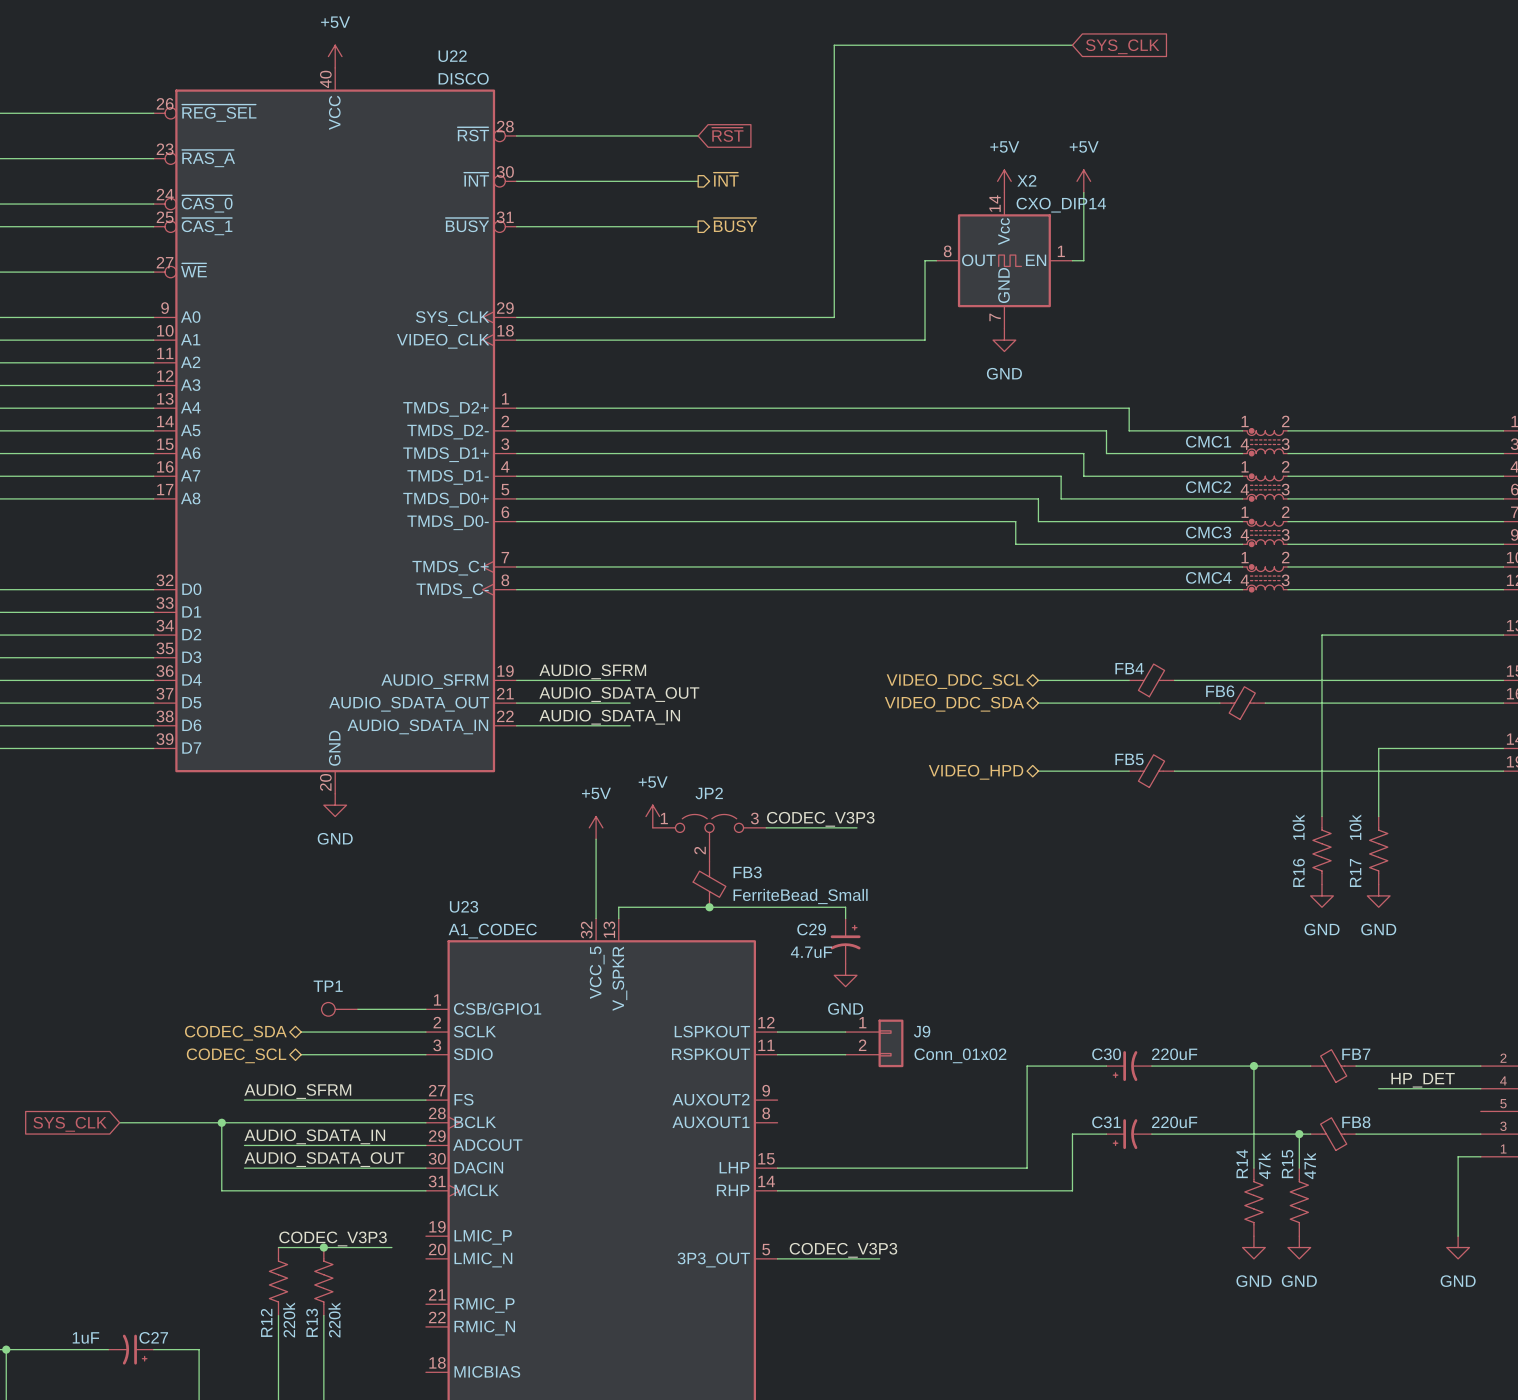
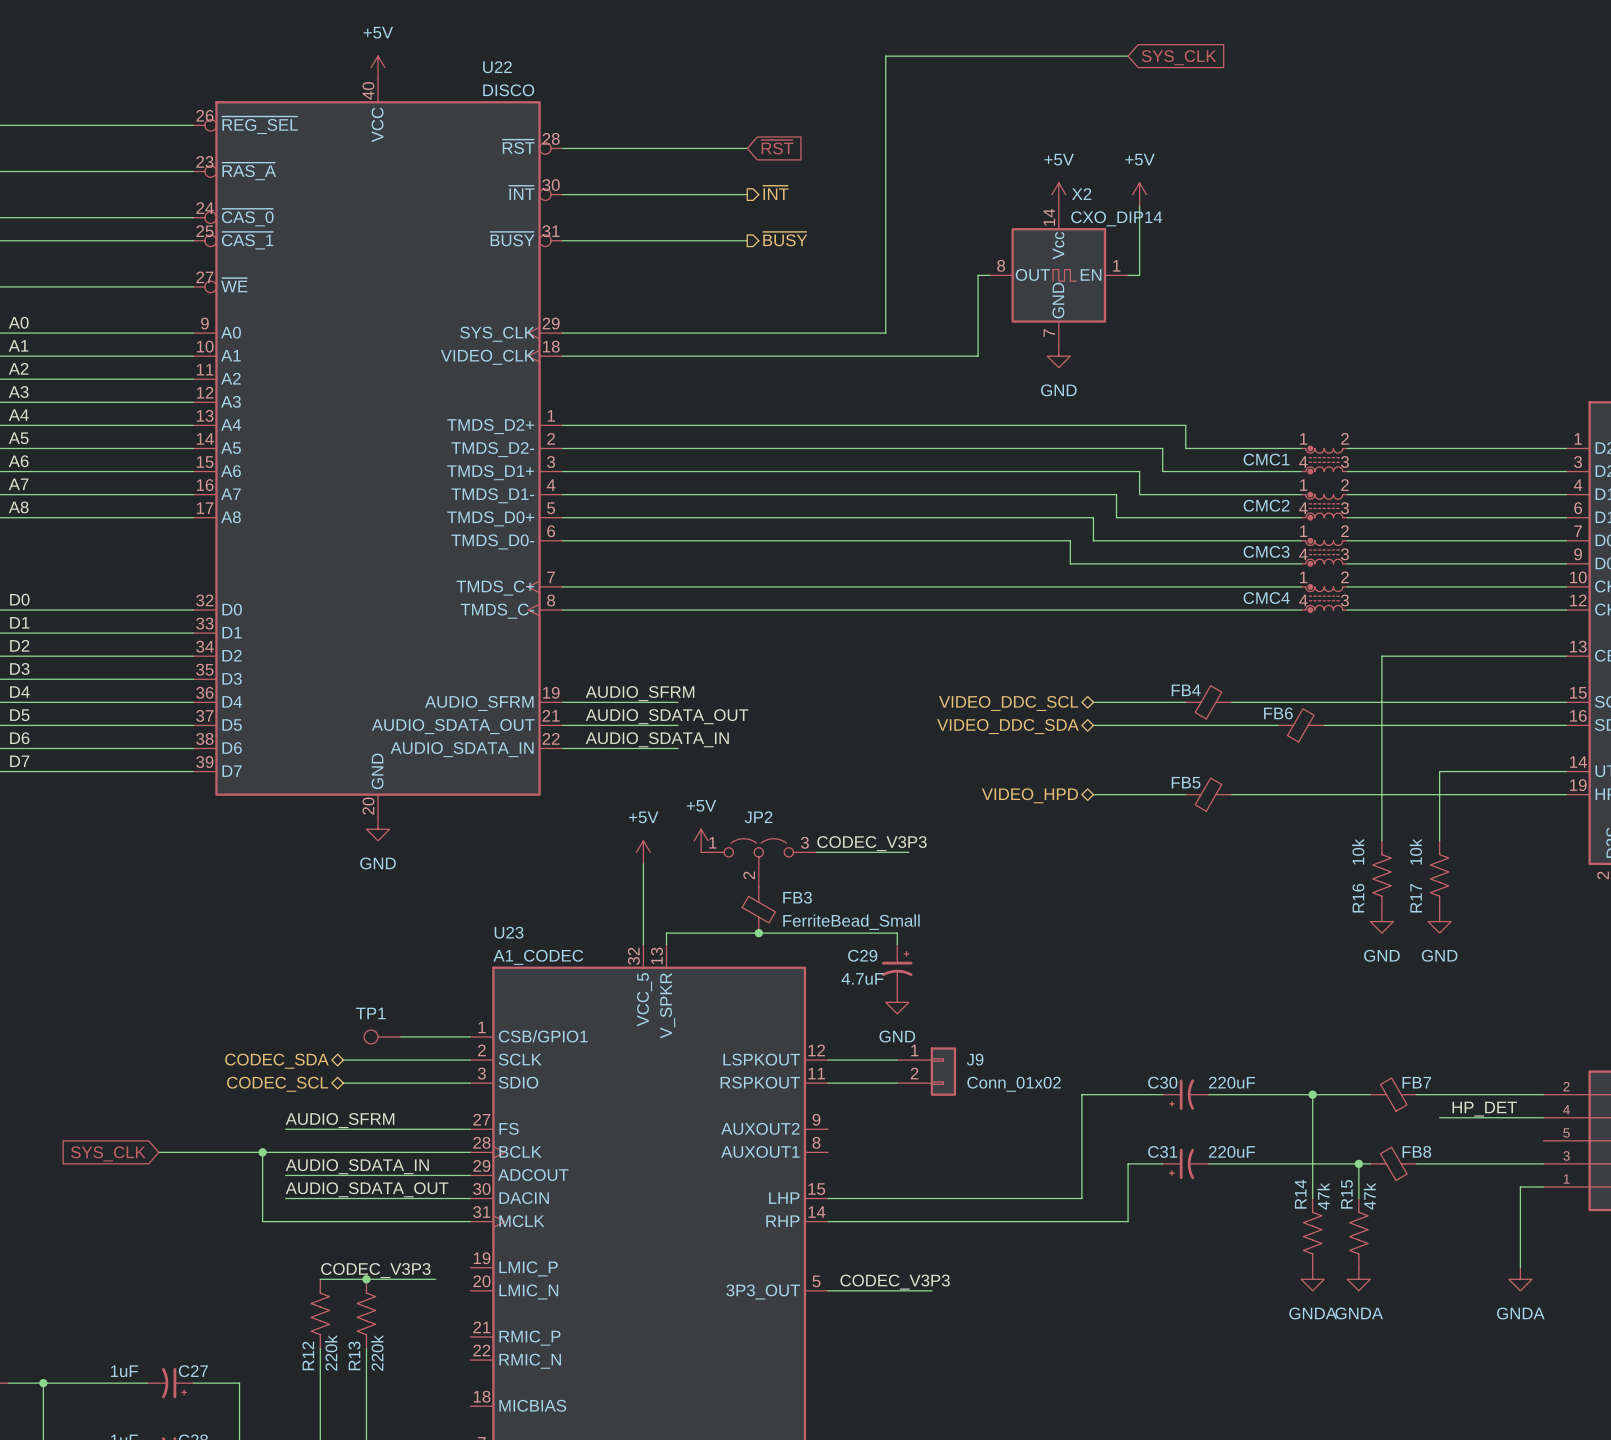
power symbol: GND (1253, 1247) -> GNDA (1312, 1279)
power symbol: GND (1299, 1247) -> GNDA (1358, 1279)
power symbol: GND (1458, 1247) -> GNDA (1520, 1279)

